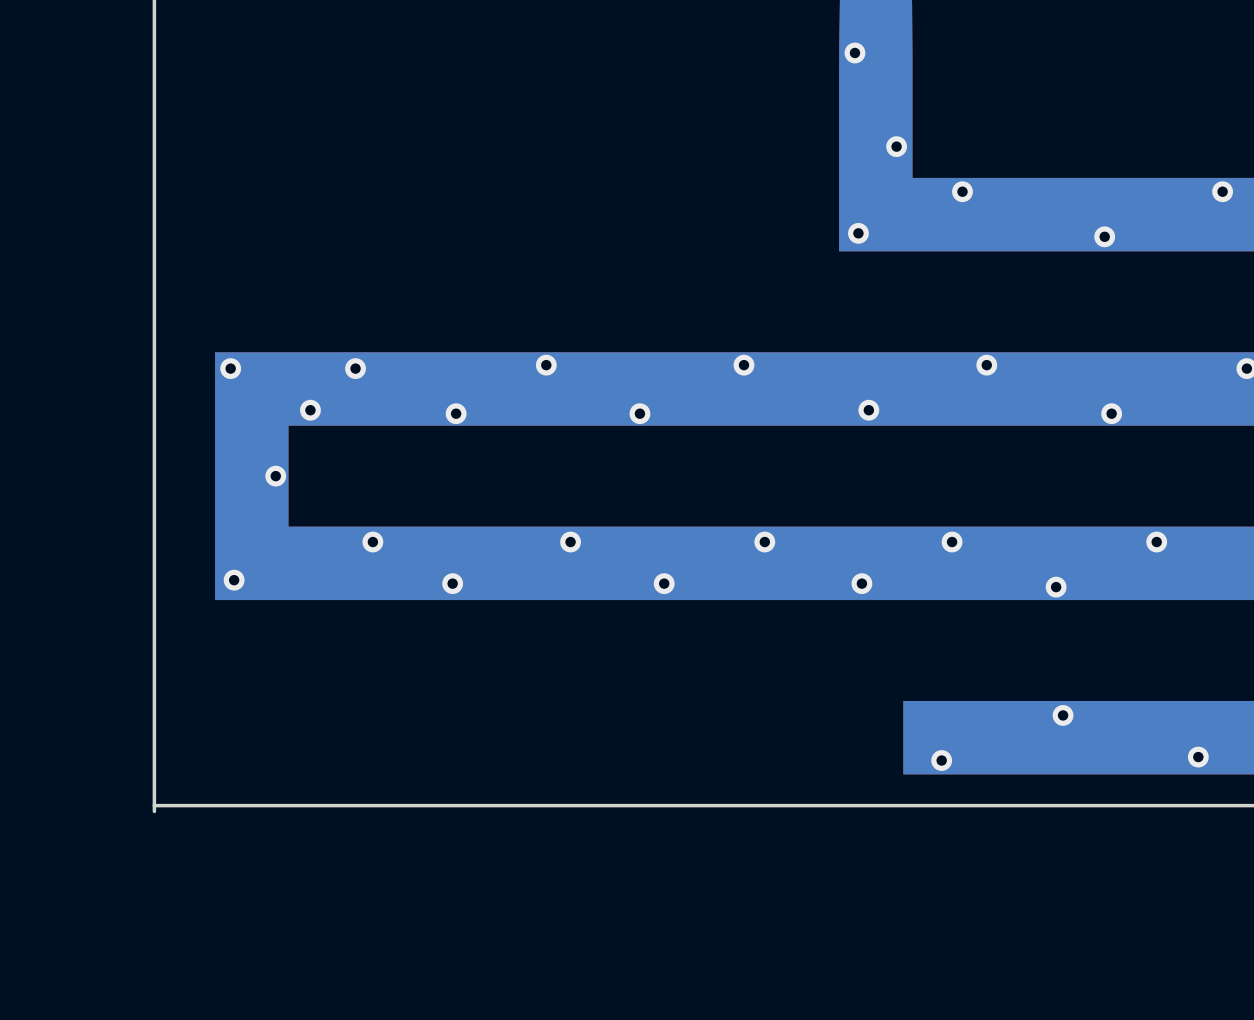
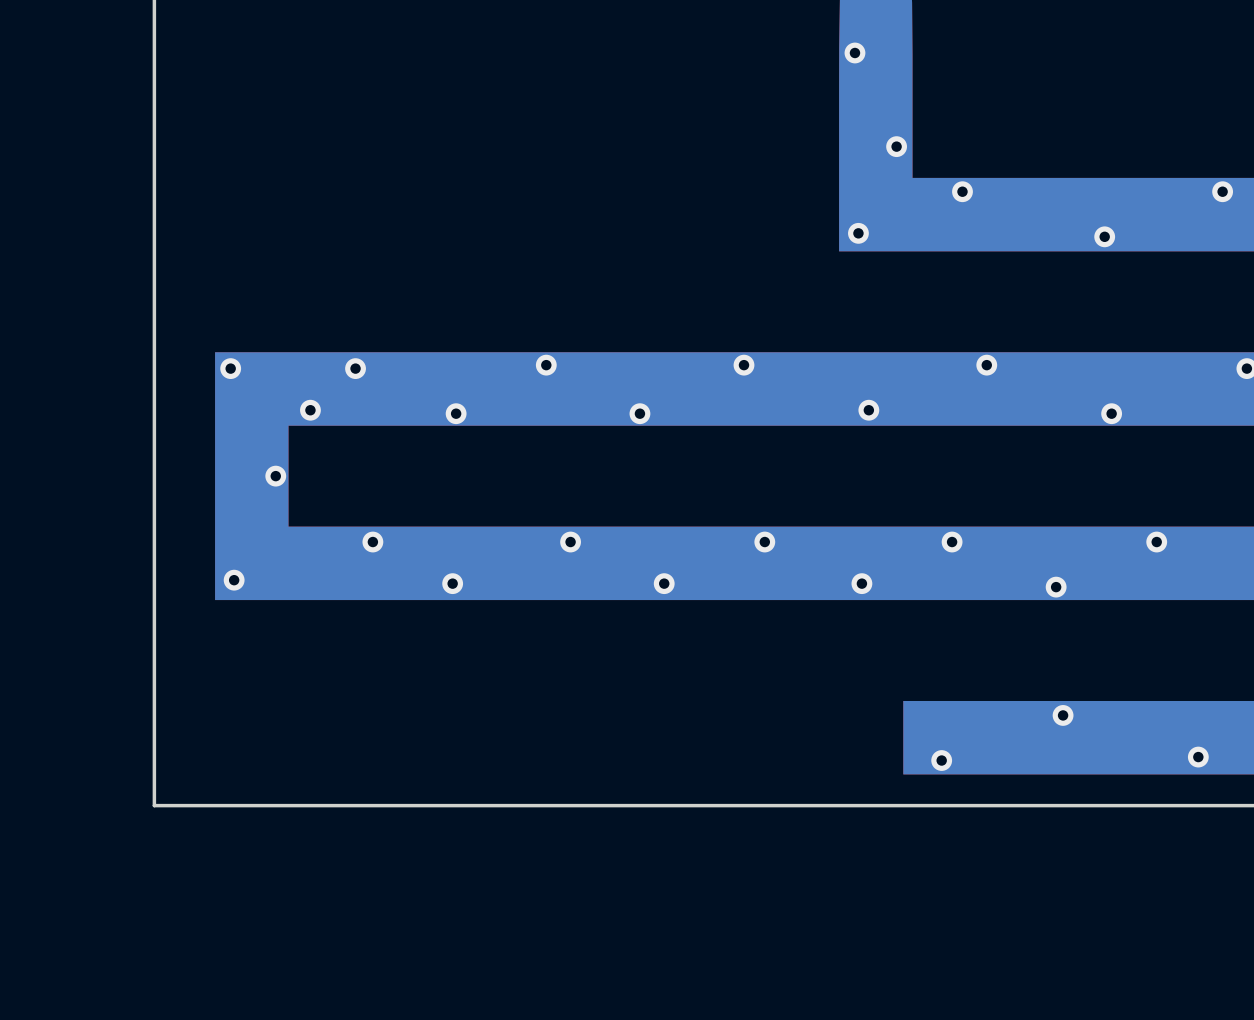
board edge: (154, 805) (154, 811) -> none

